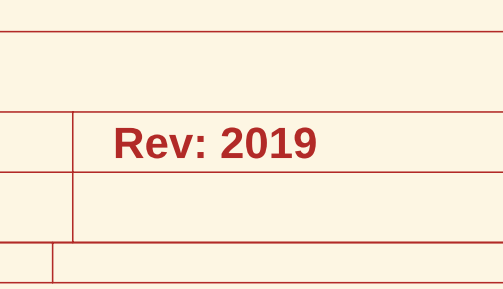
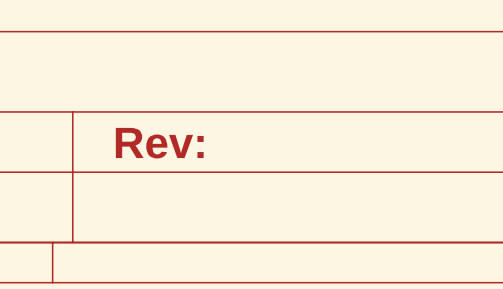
title block: Rev: 2019 (215, 142) -> Rev: (159, 143)

